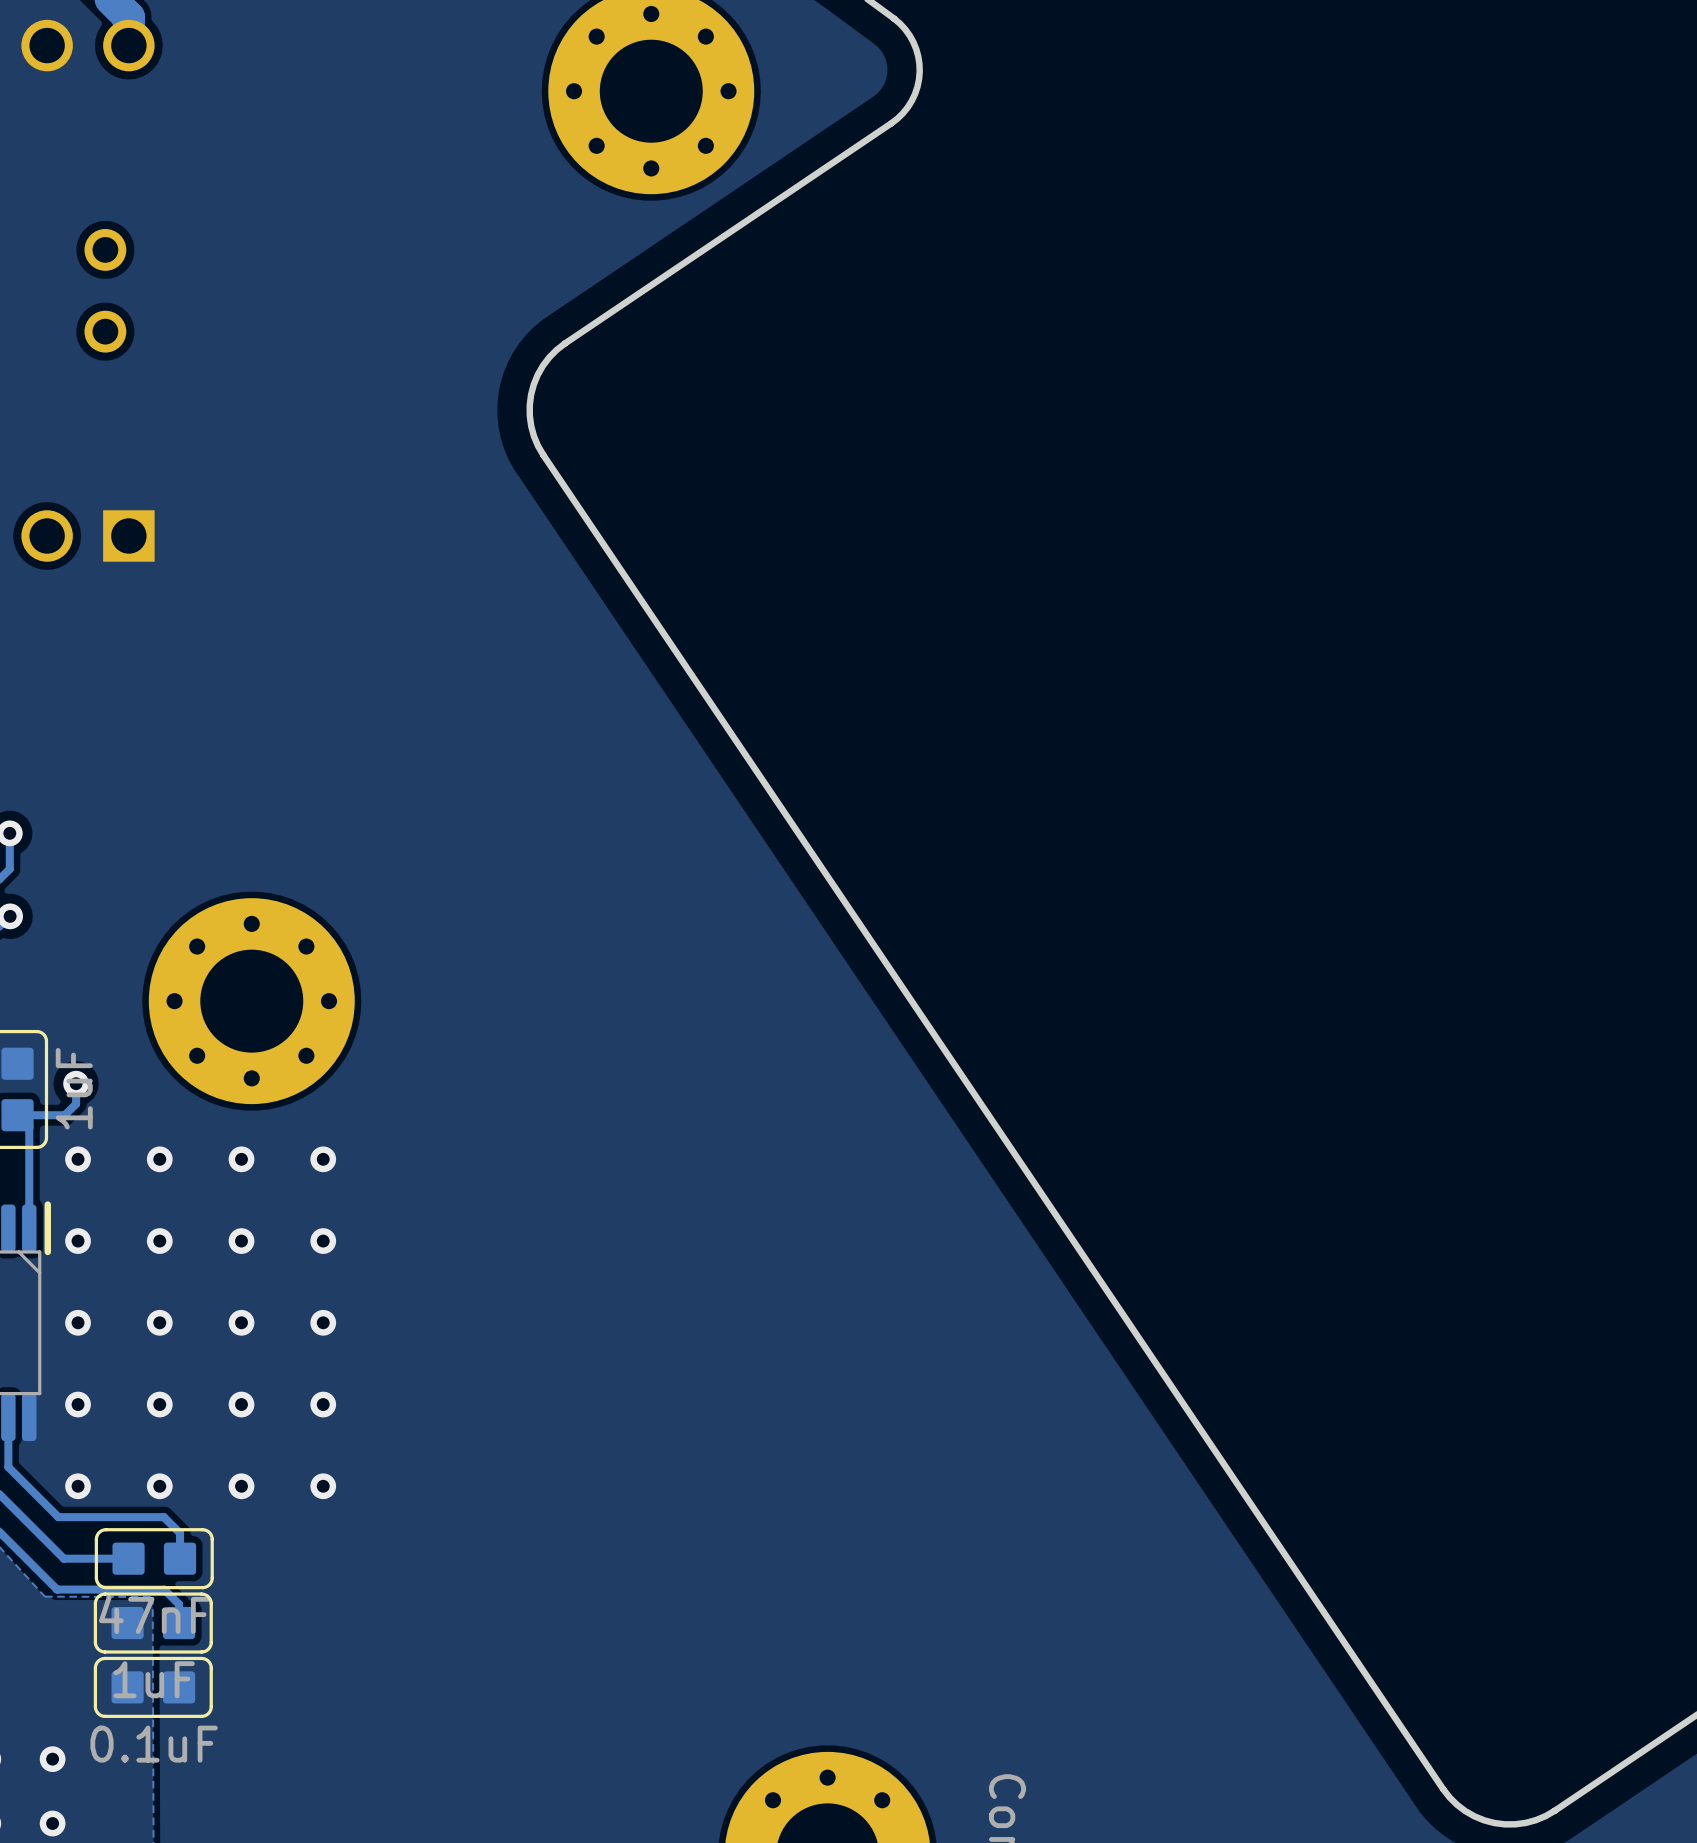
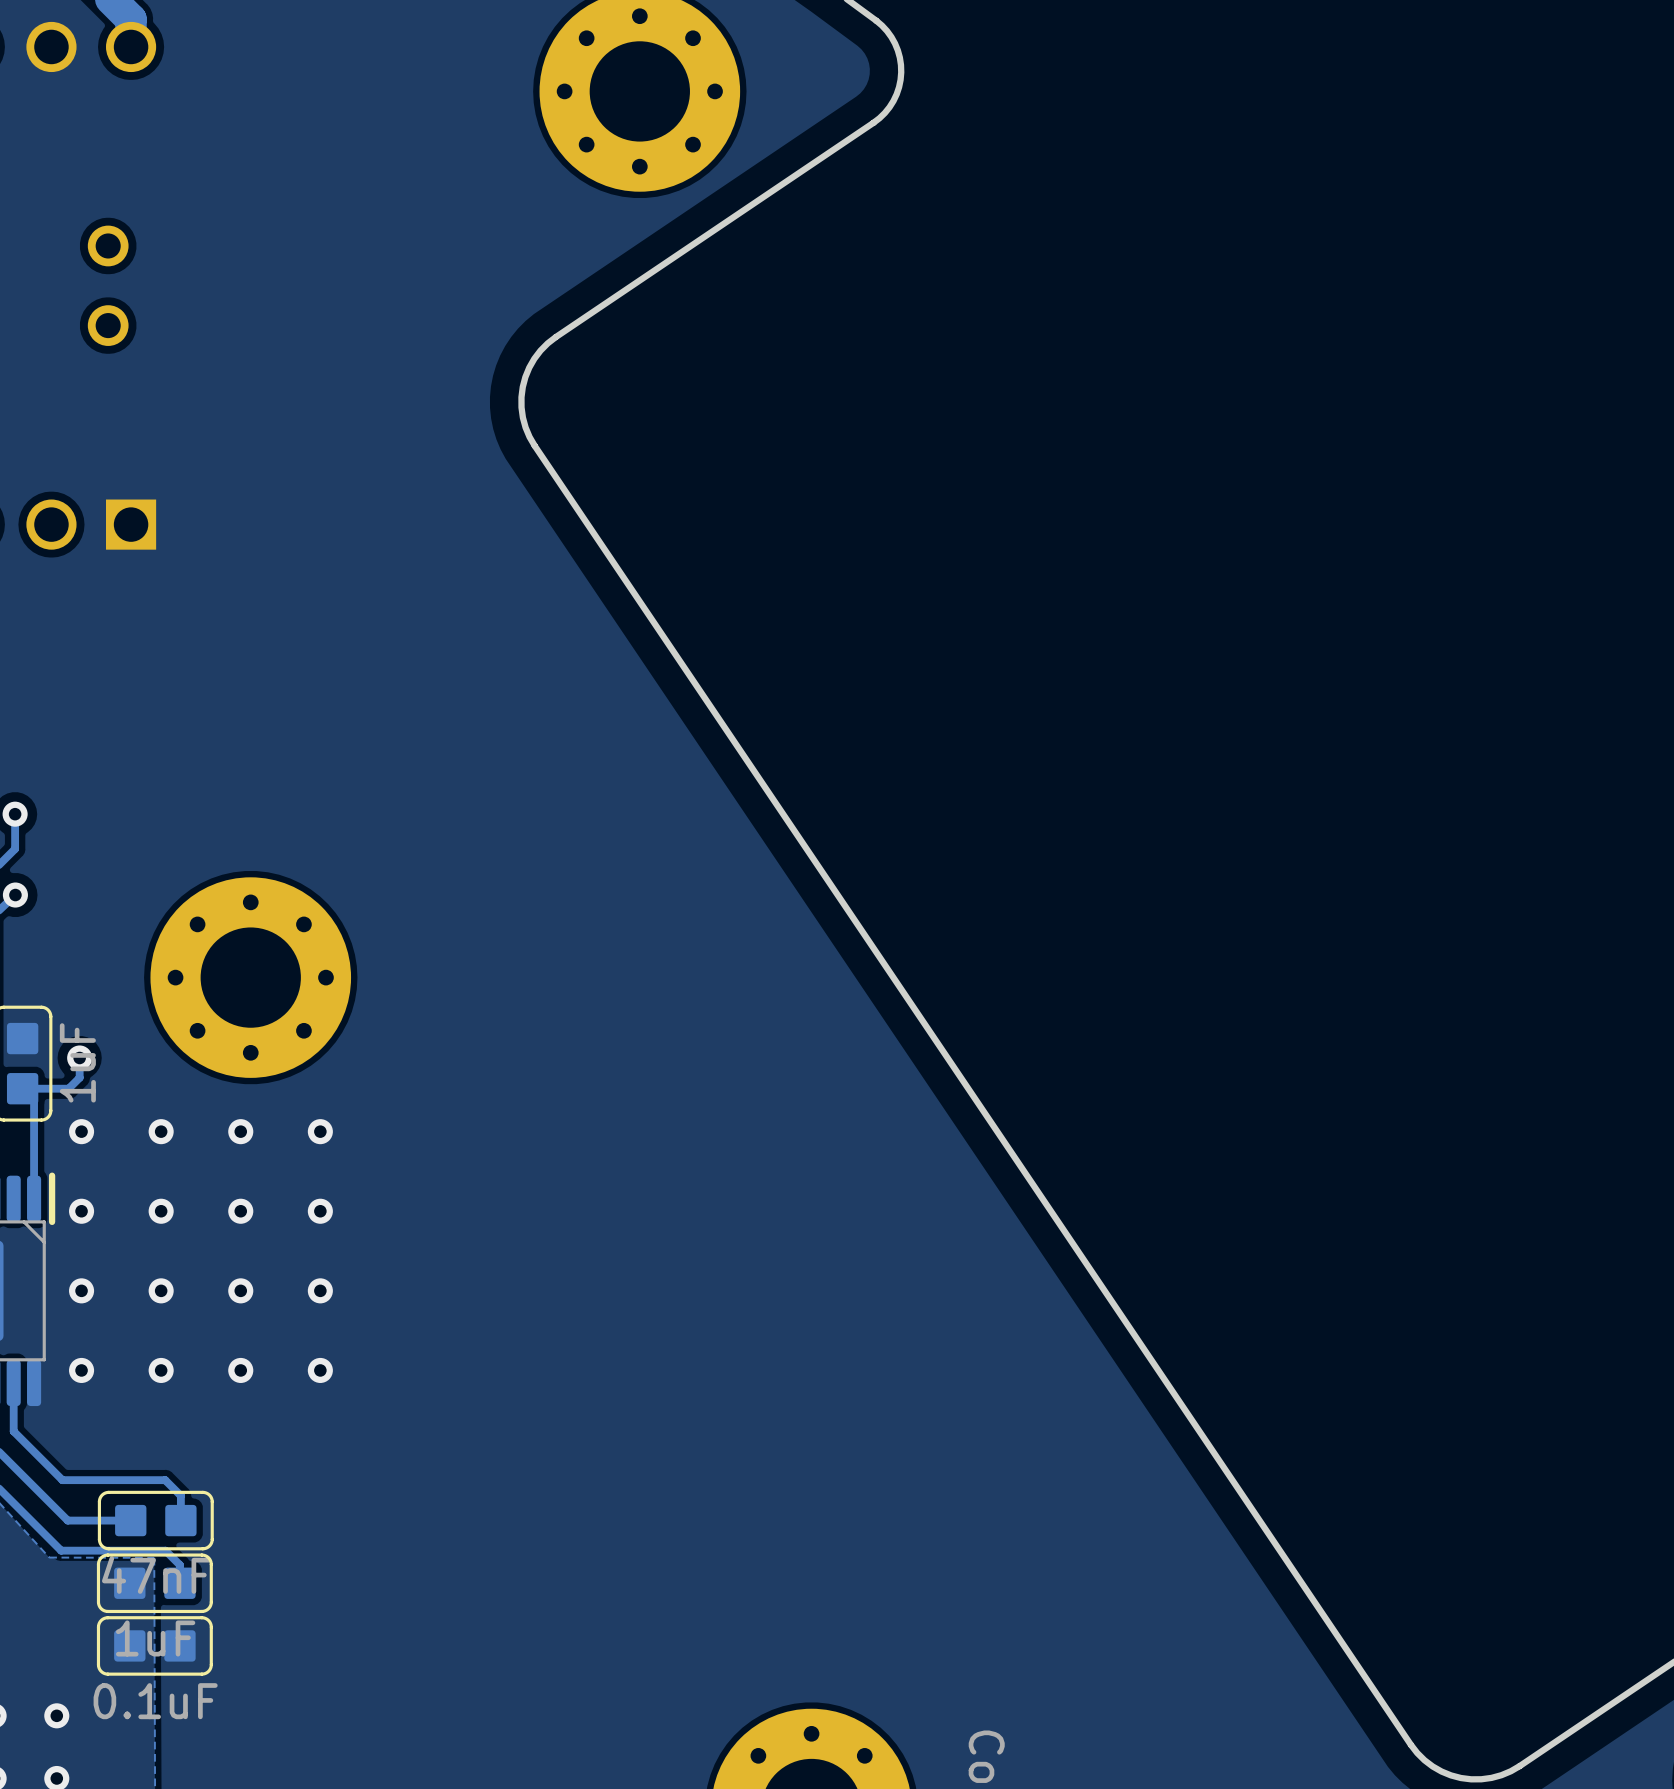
via: (78, 1486) -> none
via: (159, 1486) -> none
via: (241, 1486) -> none
via: (323, 1486) -> none

